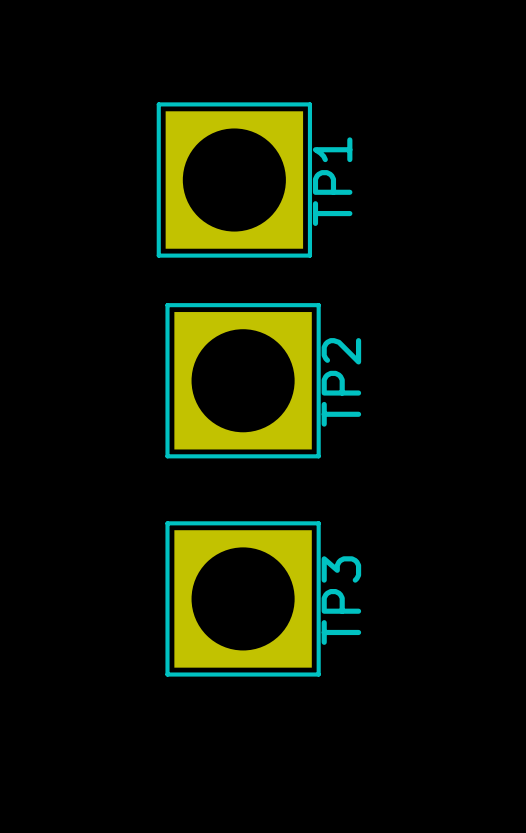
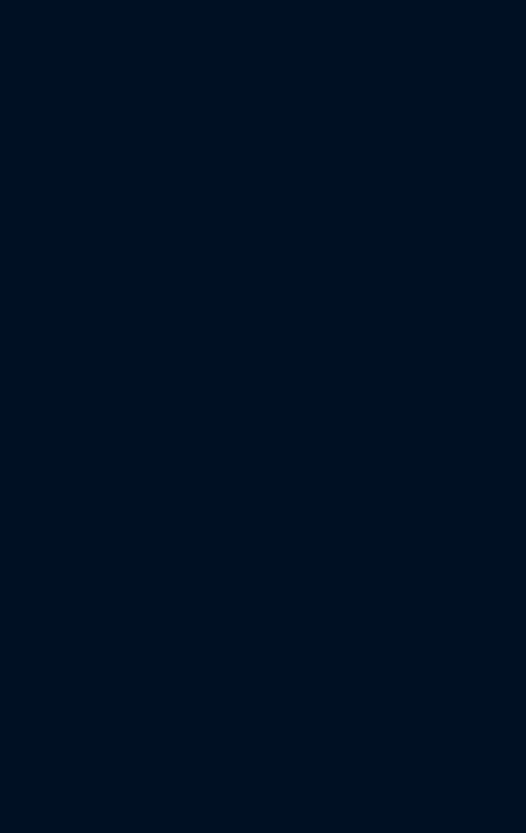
TP1: (234, 180) -> none
TP2: (243, 380) -> none
TP3: (243, 598) -> none

